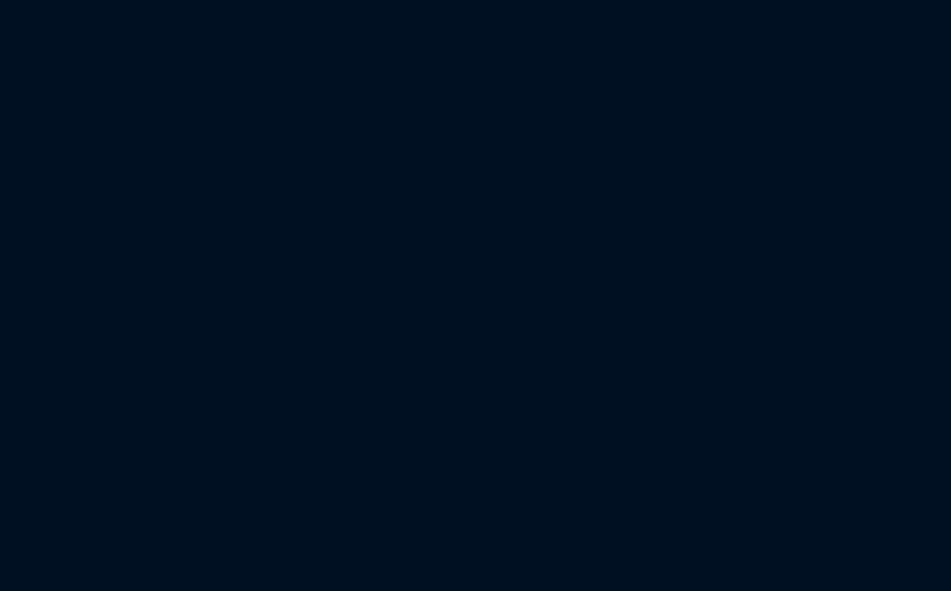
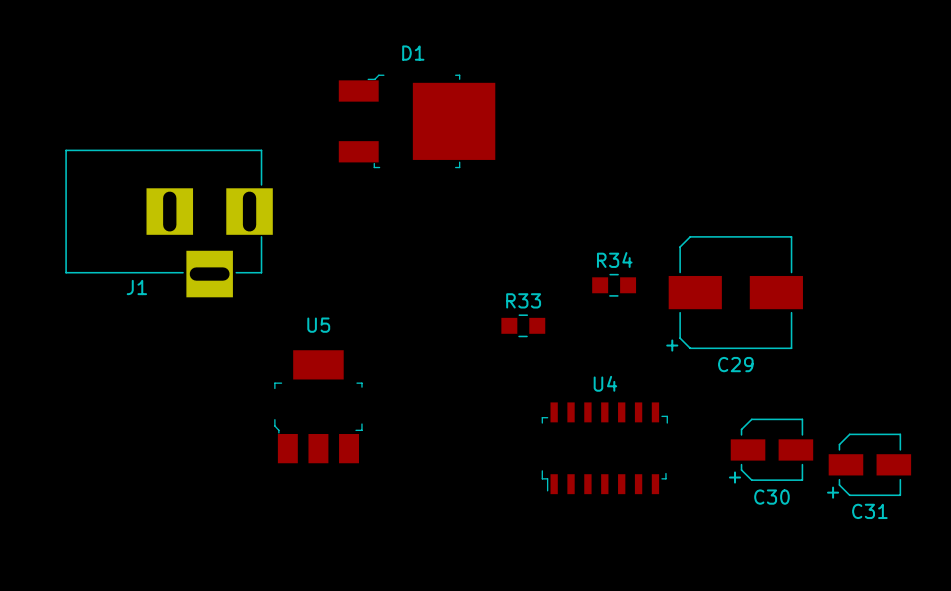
D1: none -> (417, 121)
J1: none -> (169, 223)
R34: none -> (614, 285)
C29: none -> (735, 292)
R33: none -> (523, 325)
U5: none -> (318, 406)
U4: none -> (604, 448)
C30: none -> (771, 449)
C31: none -> (869, 464)

